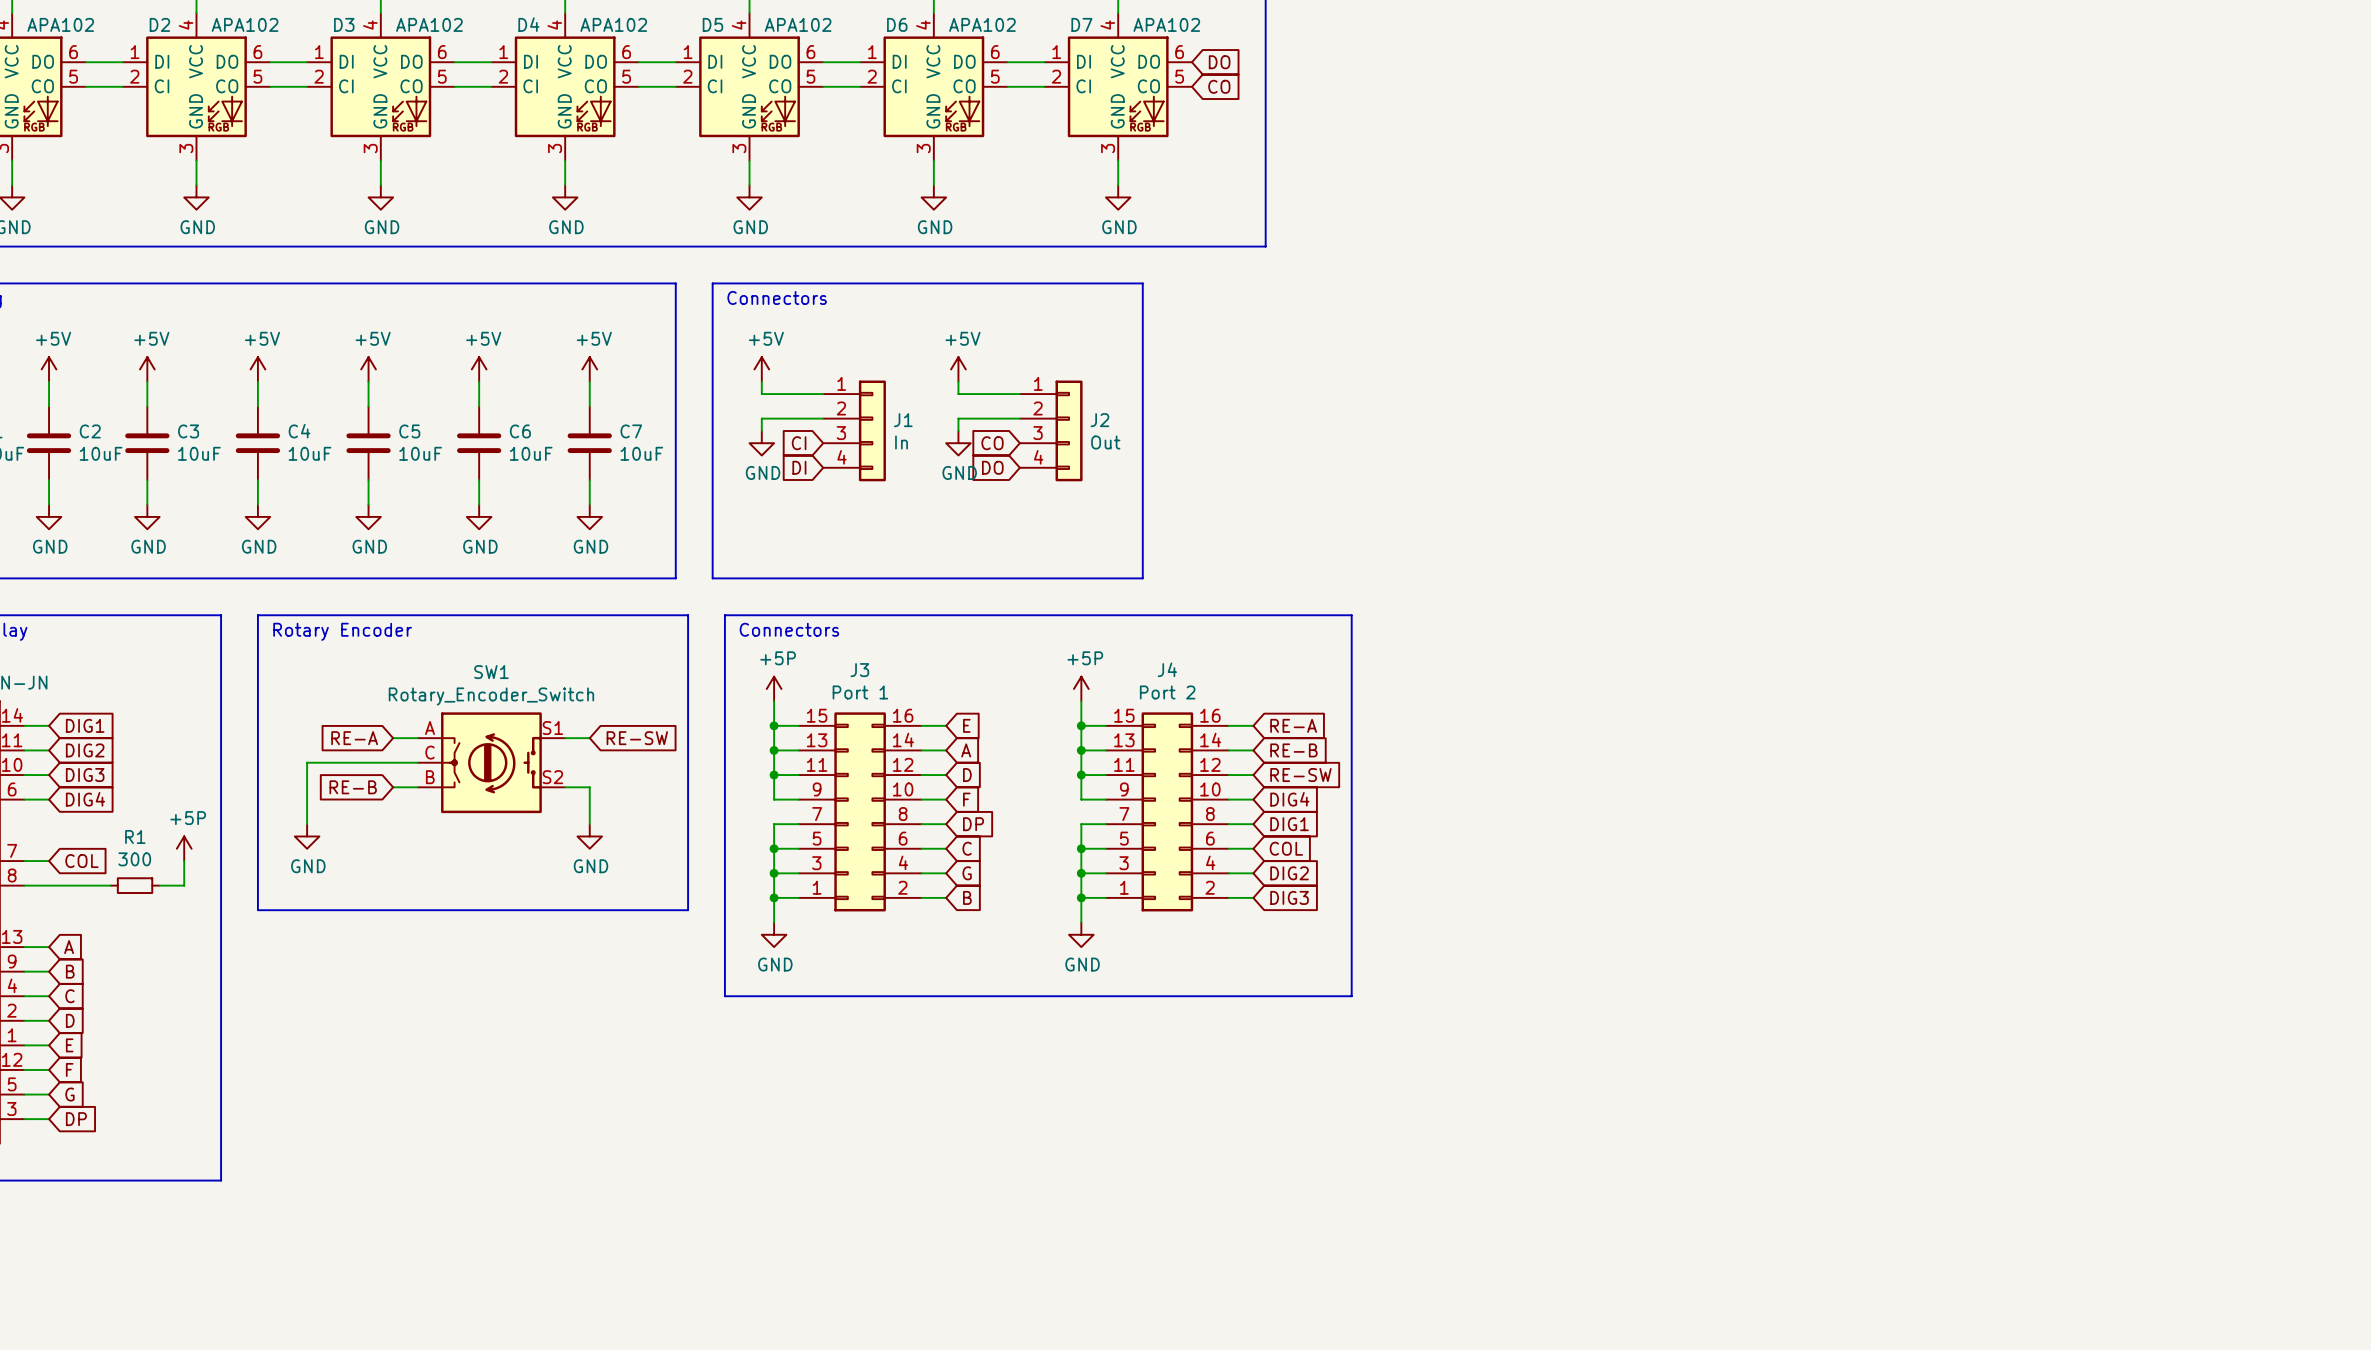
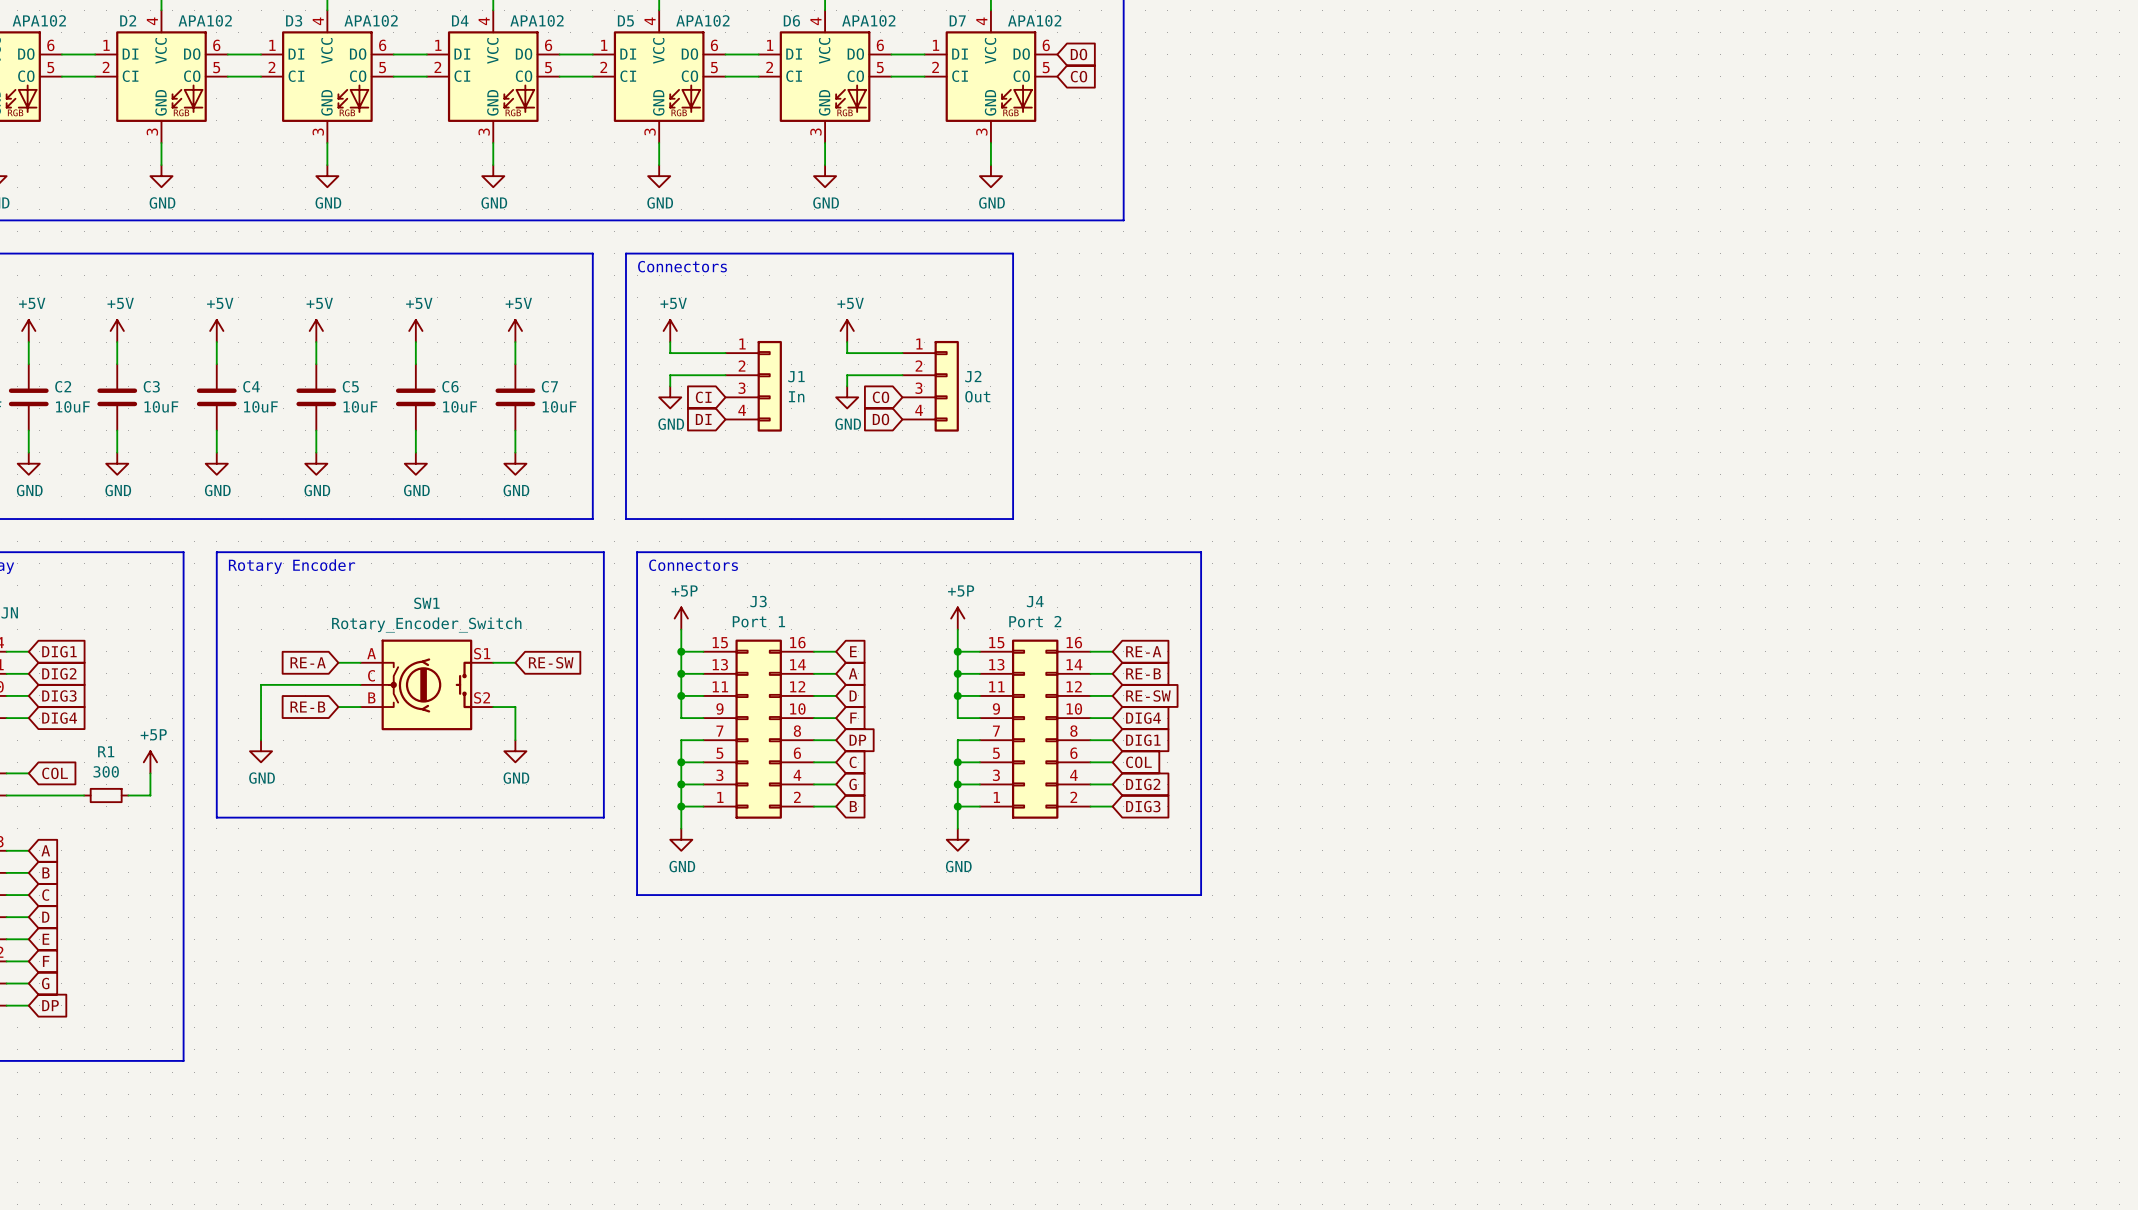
SW1 symbol: [417, 712, 566, 814] -> [360, 639, 494, 731]

